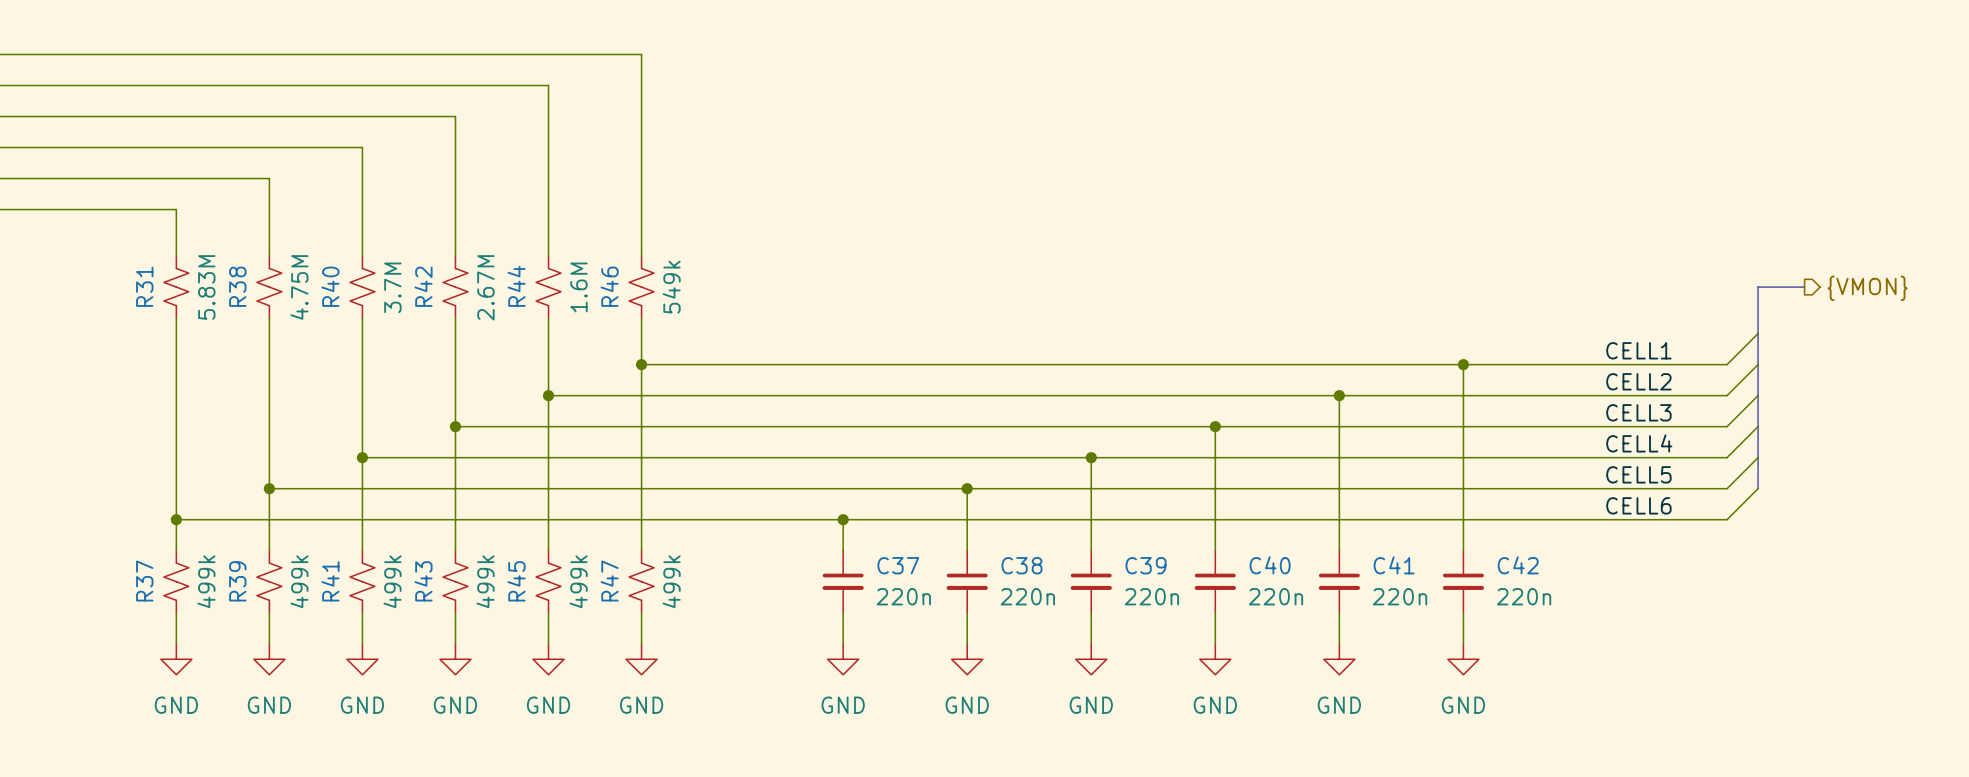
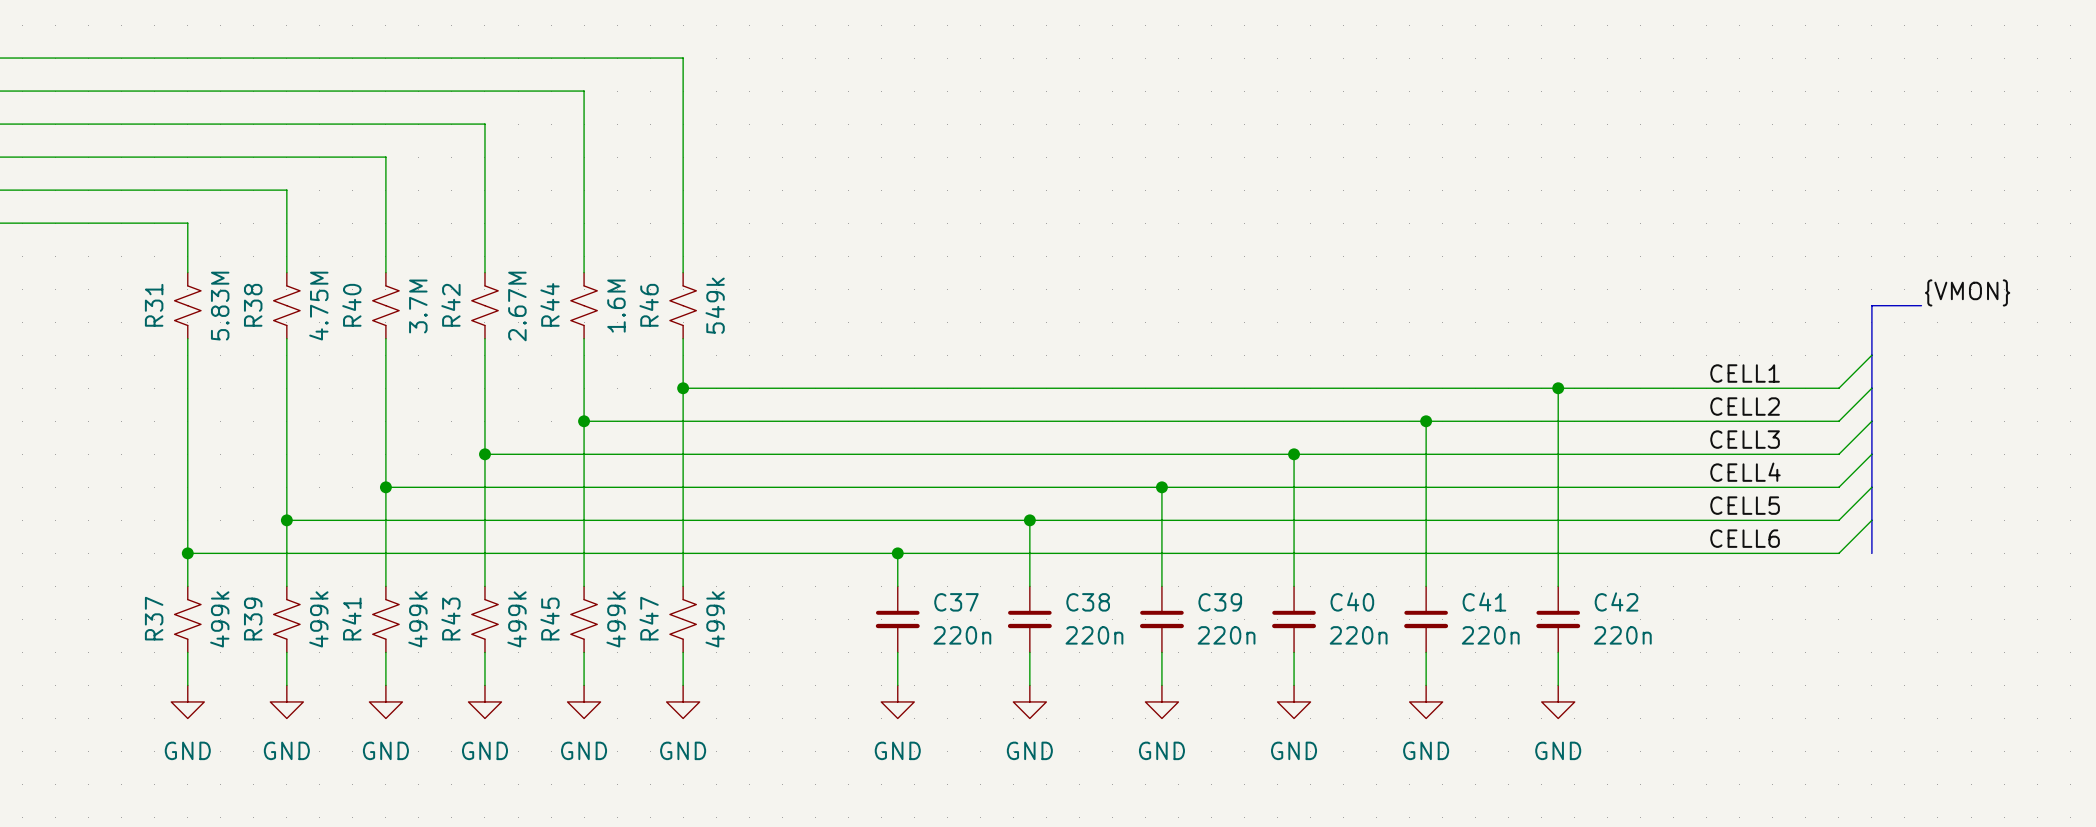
label: none -> {VMON} (1967, 292)
hierarchical label: {VMON} (1867, 288) -> none
bus: none -> (1871, 520) (1871, 553)

